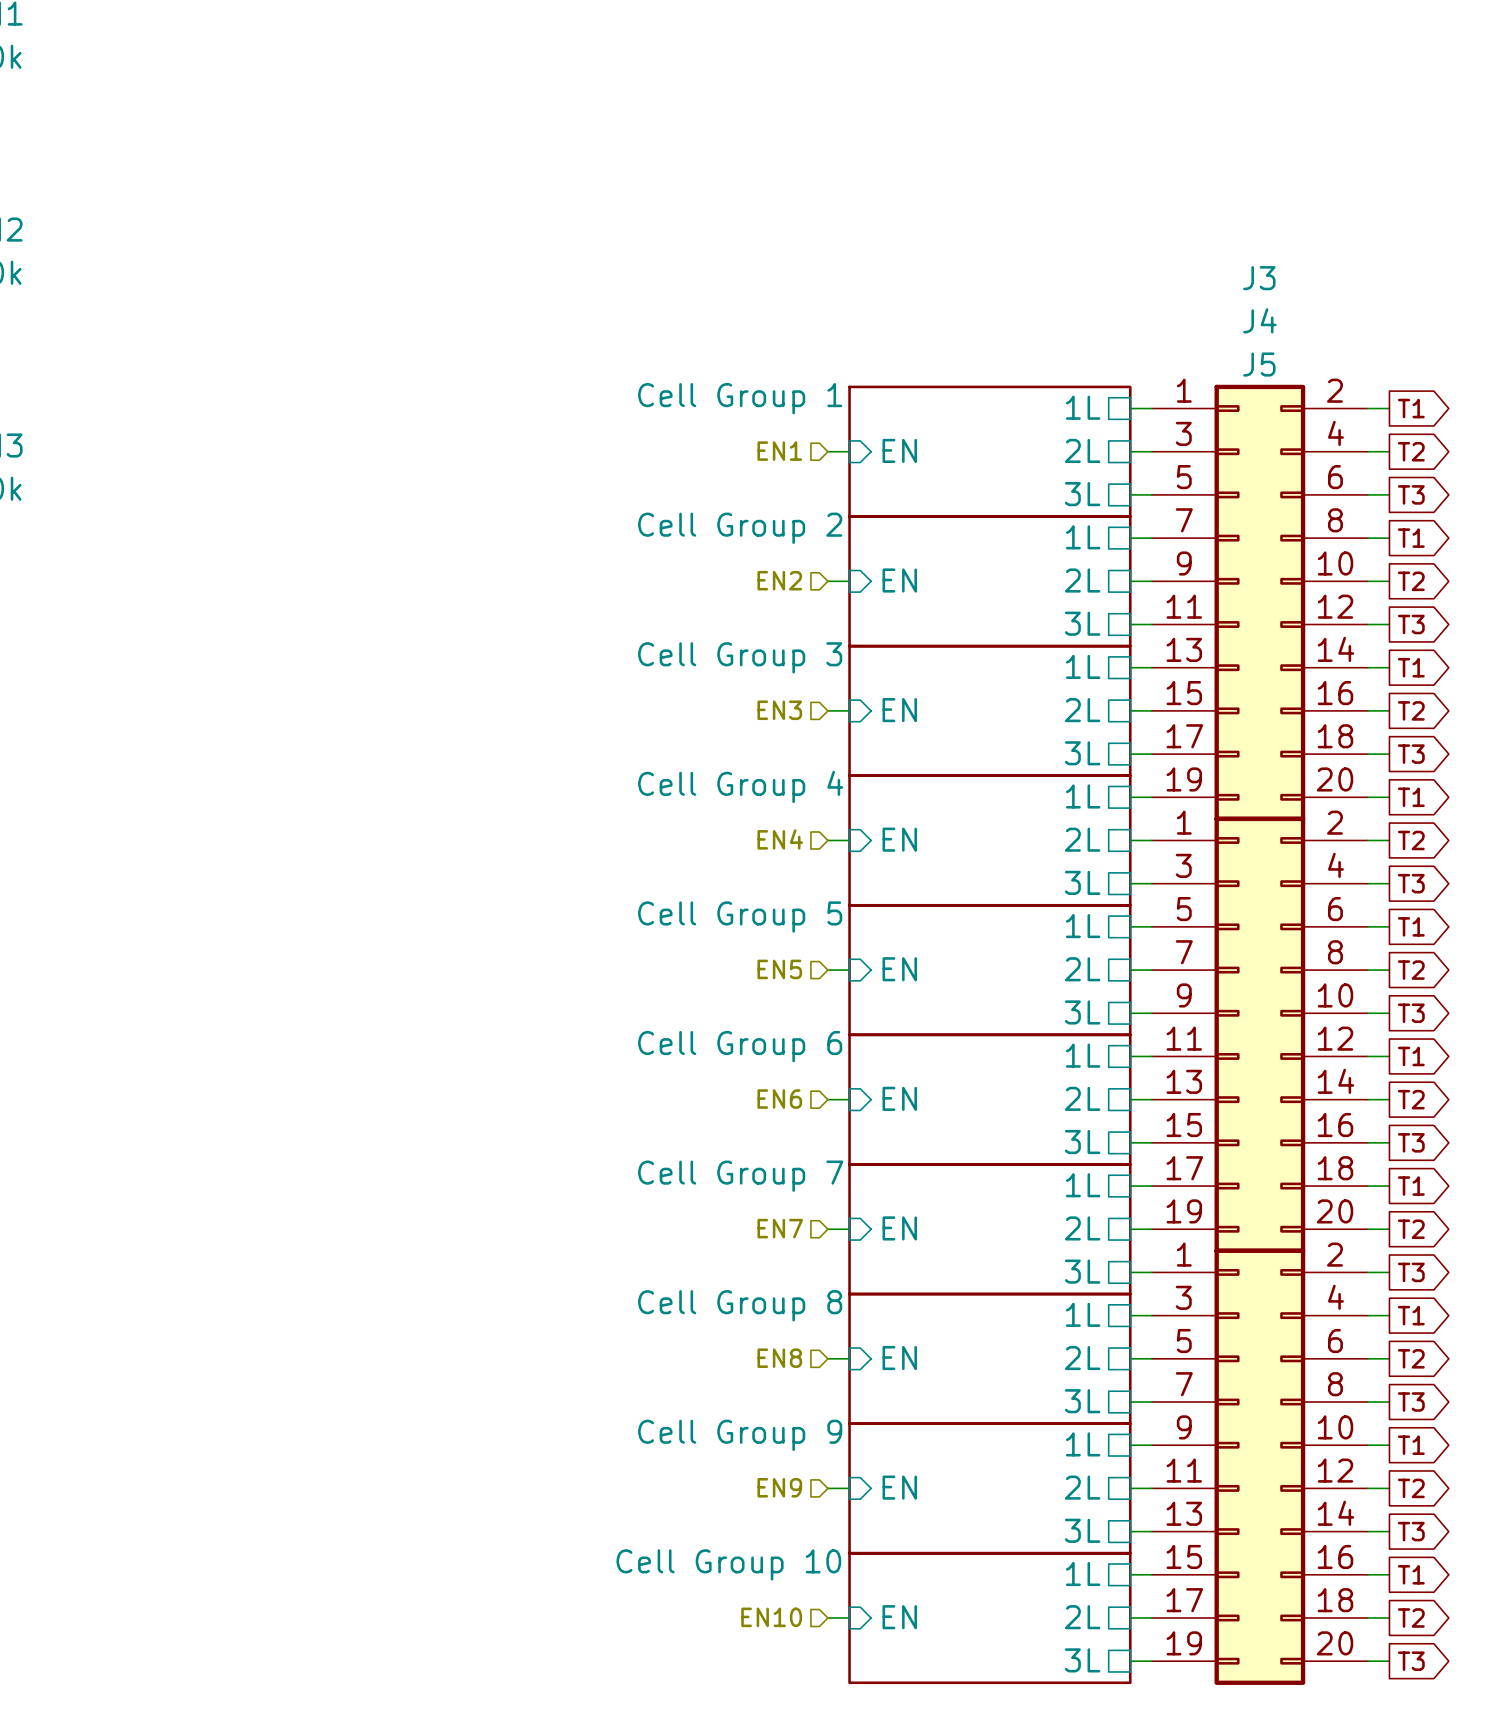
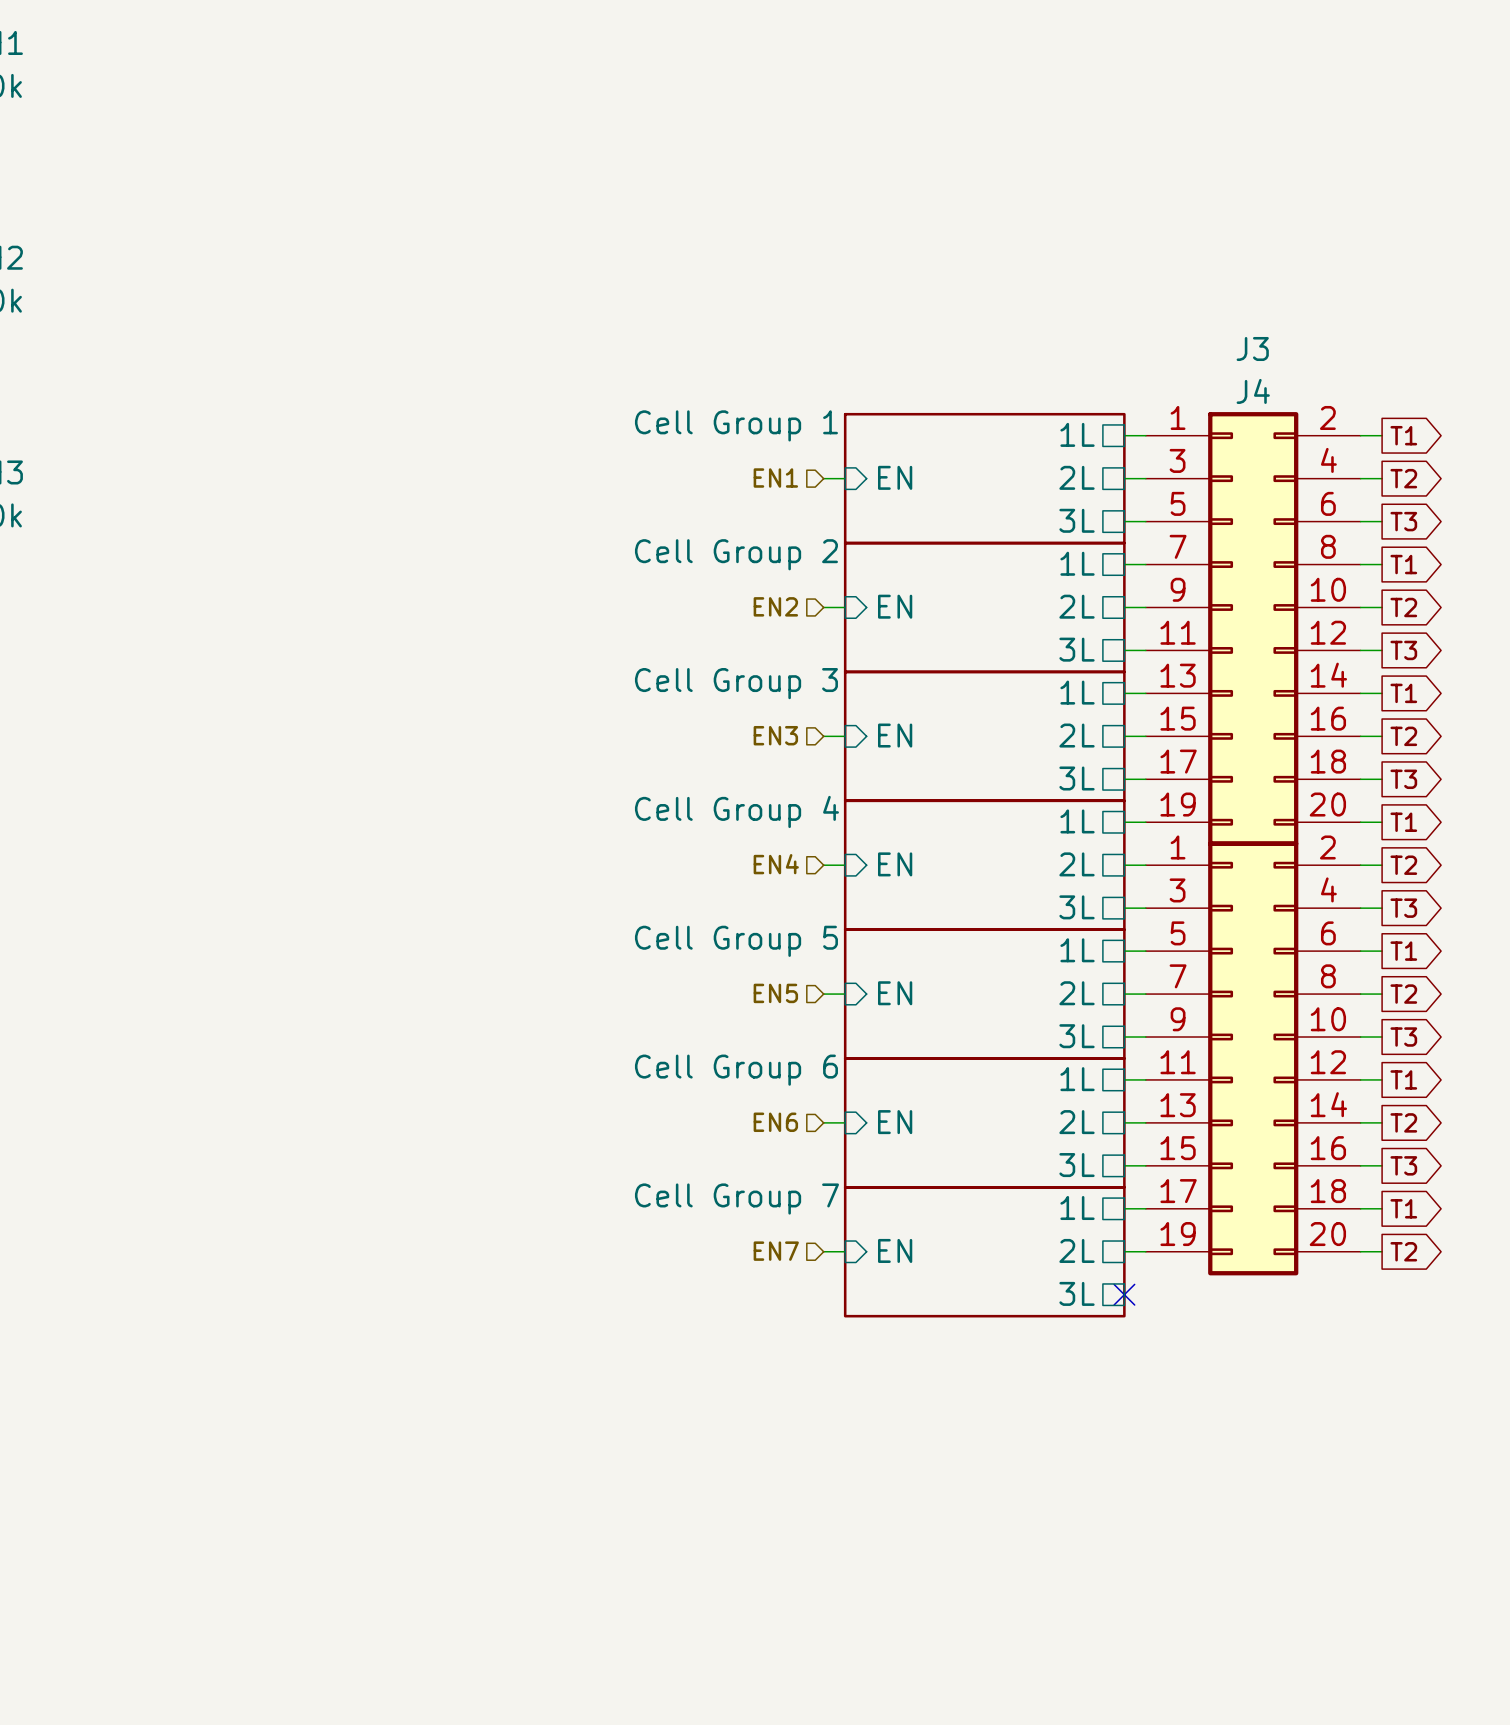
J3 name position: J3 (1259, 278) -> J3 (1252, 348)
J4 name position: J4 (1259, 320) -> J4 (1253, 391)
wire: (1130, 1272) (1151, 1272) -> none
no-connect mark: none -> (1124, 1294)
wire: (1367, 1272) (1389, 1272) -> none
global label: T3 (1411, 1272) -> none
sheet pin: 1L (1083, 1314) -> none
wire: (1130, 1315) (1151, 1315) -> none
wire: (1367, 1315) (1389, 1315) -> none
global label: T1 (1411, 1315) -> none
hierarchical label: EN8 (779, 1358) -> none
wire: (827, 1358) (849, 1358) -> none
sheet pin: EN (899, 1358) -> none
sheet Cell Group 8: (989, 1358) -> none
sheet pin: 2L (1082, 1358) -> none
wire: (1130, 1358) (1151, 1358) -> none
wire: (1367, 1358) (1389, 1358) -> none
global label: T2 (1411, 1358) -> none
sheet pin: 3L (1082, 1401) -> none
wire: (1130, 1402) (1151, 1402) -> none
wire: (1367, 1402) (1389, 1402) -> none
global label: T3 (1411, 1402) -> none
sheet pin: 1L (1083, 1444) -> none
wire: (1130, 1445) (1151, 1445) -> none
wire: (1367, 1445) (1389, 1445) -> none
global label: T1 (1411, 1445) -> none
J5: (1259, 1466) -> none
hierarchical label: EN9 (779, 1487) -> none
sheet pin: EN (899, 1487) -> none
sheet pin: 2L (1082, 1487) -> none
wire: (827, 1488) (849, 1488) -> none
sheet Cell Group 9: (989, 1488) -> none
wire: (1130, 1488) (1151, 1488) -> none
wire: (1367, 1488) (1389, 1488) -> none
global label: T2 (1411, 1488) -> none
sheet pin: 3L (1082, 1530) -> none
wire: (1130, 1531) (1151, 1531) -> none
wire: (1367, 1531) (1389, 1531) -> none
global label: T3 (1411, 1531) -> none
sheet pin: 1L (1083, 1573) -> none
wire: (1130, 1574) (1151, 1574) -> none
wire: (1367, 1574) (1389, 1574) -> none
global label: T1 (1411, 1574) -> none
hierarchical label: EN10 (771, 1617) -> none
wire: (827, 1617) (849, 1617) -> none
sheet pin: EN (899, 1617) -> none
sheet Cell Group 10: (989, 1617) -> none
sheet pin: 2L (1082, 1617) -> none
wire: (1130, 1617) (1151, 1617) -> none
wire: (1367, 1617) (1389, 1617) -> none
global label: T2 (1411, 1617) -> none
sheet pin: 3L (1082, 1660) -> none
wire: (1130, 1661) (1151, 1661) -> none
wire: (1367, 1661) (1389, 1661) -> none
global label: T3 (1411, 1661) -> none

